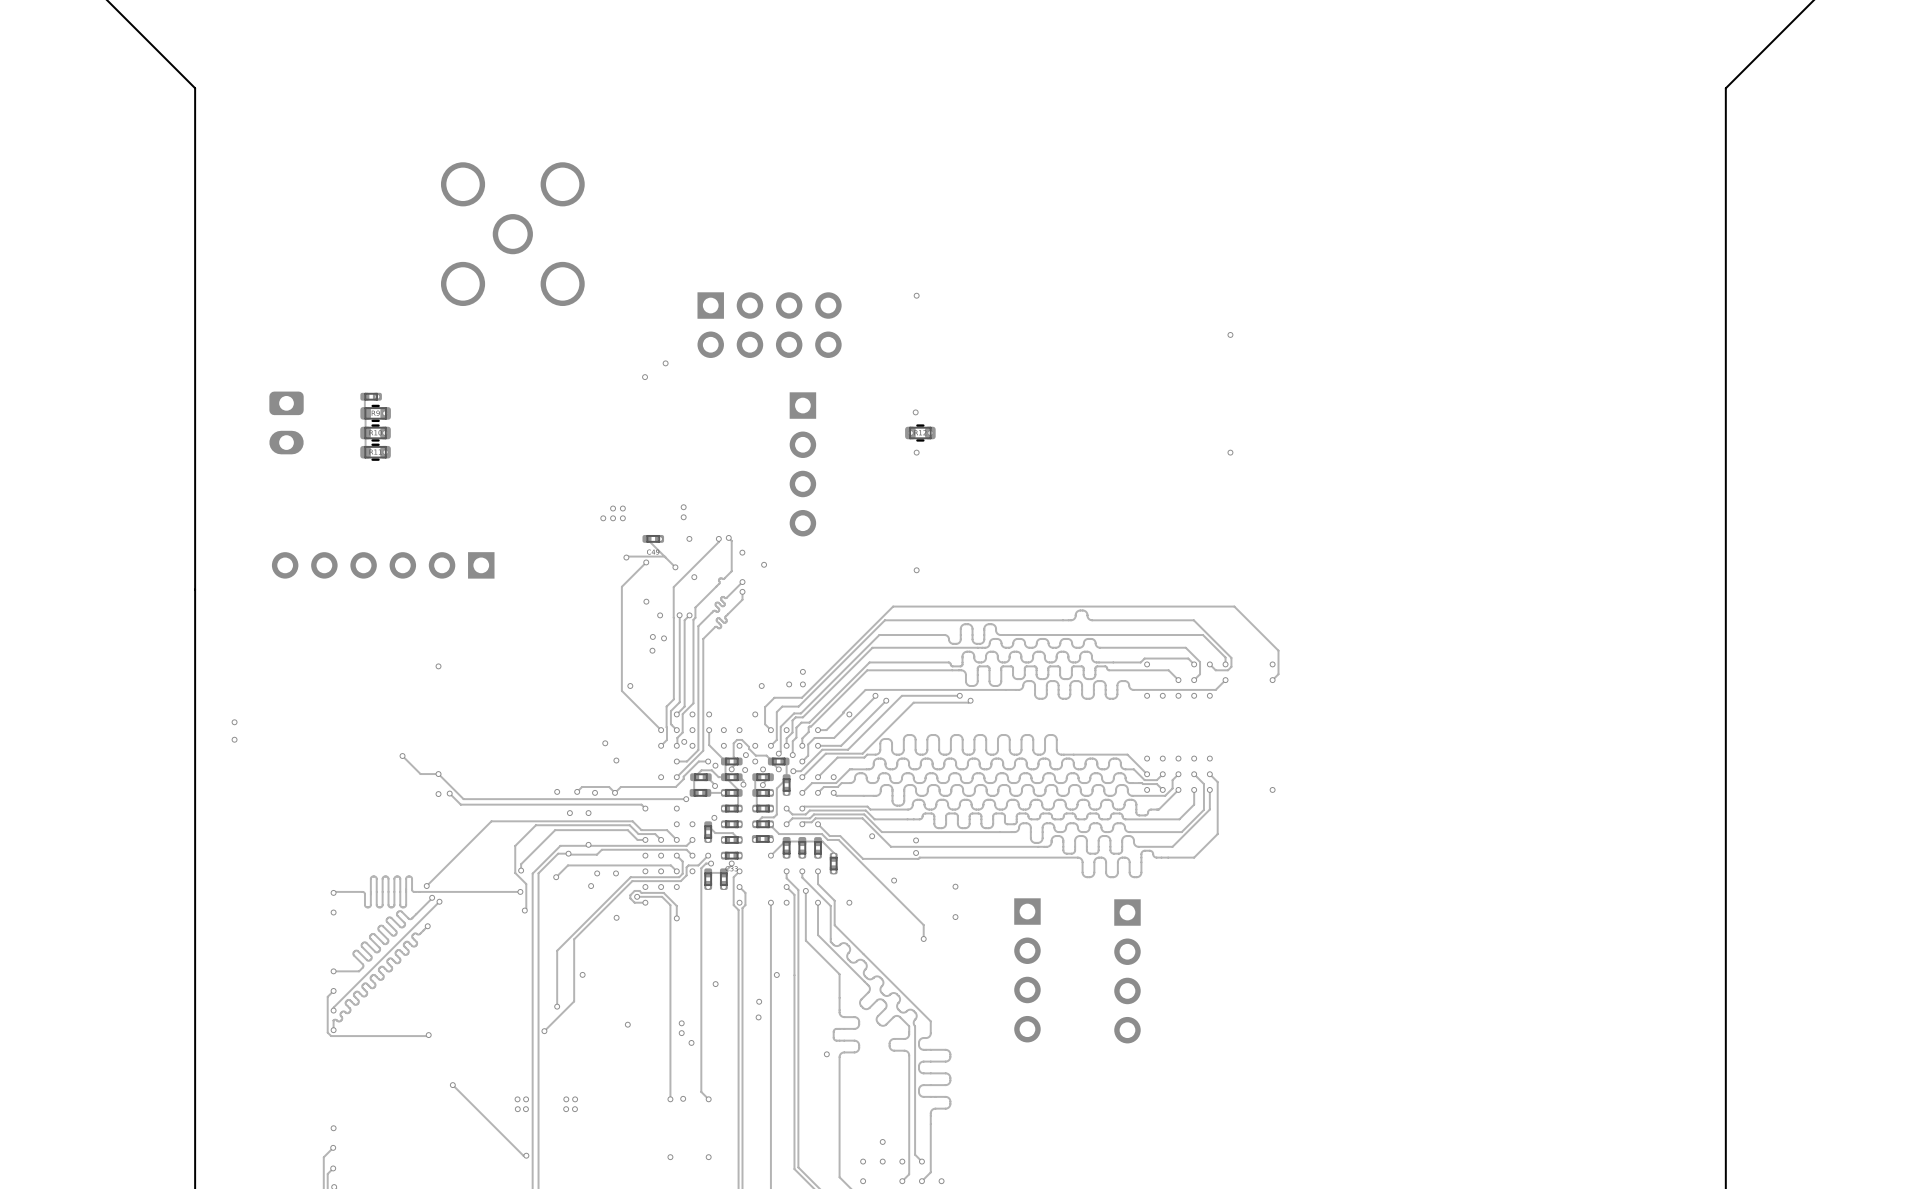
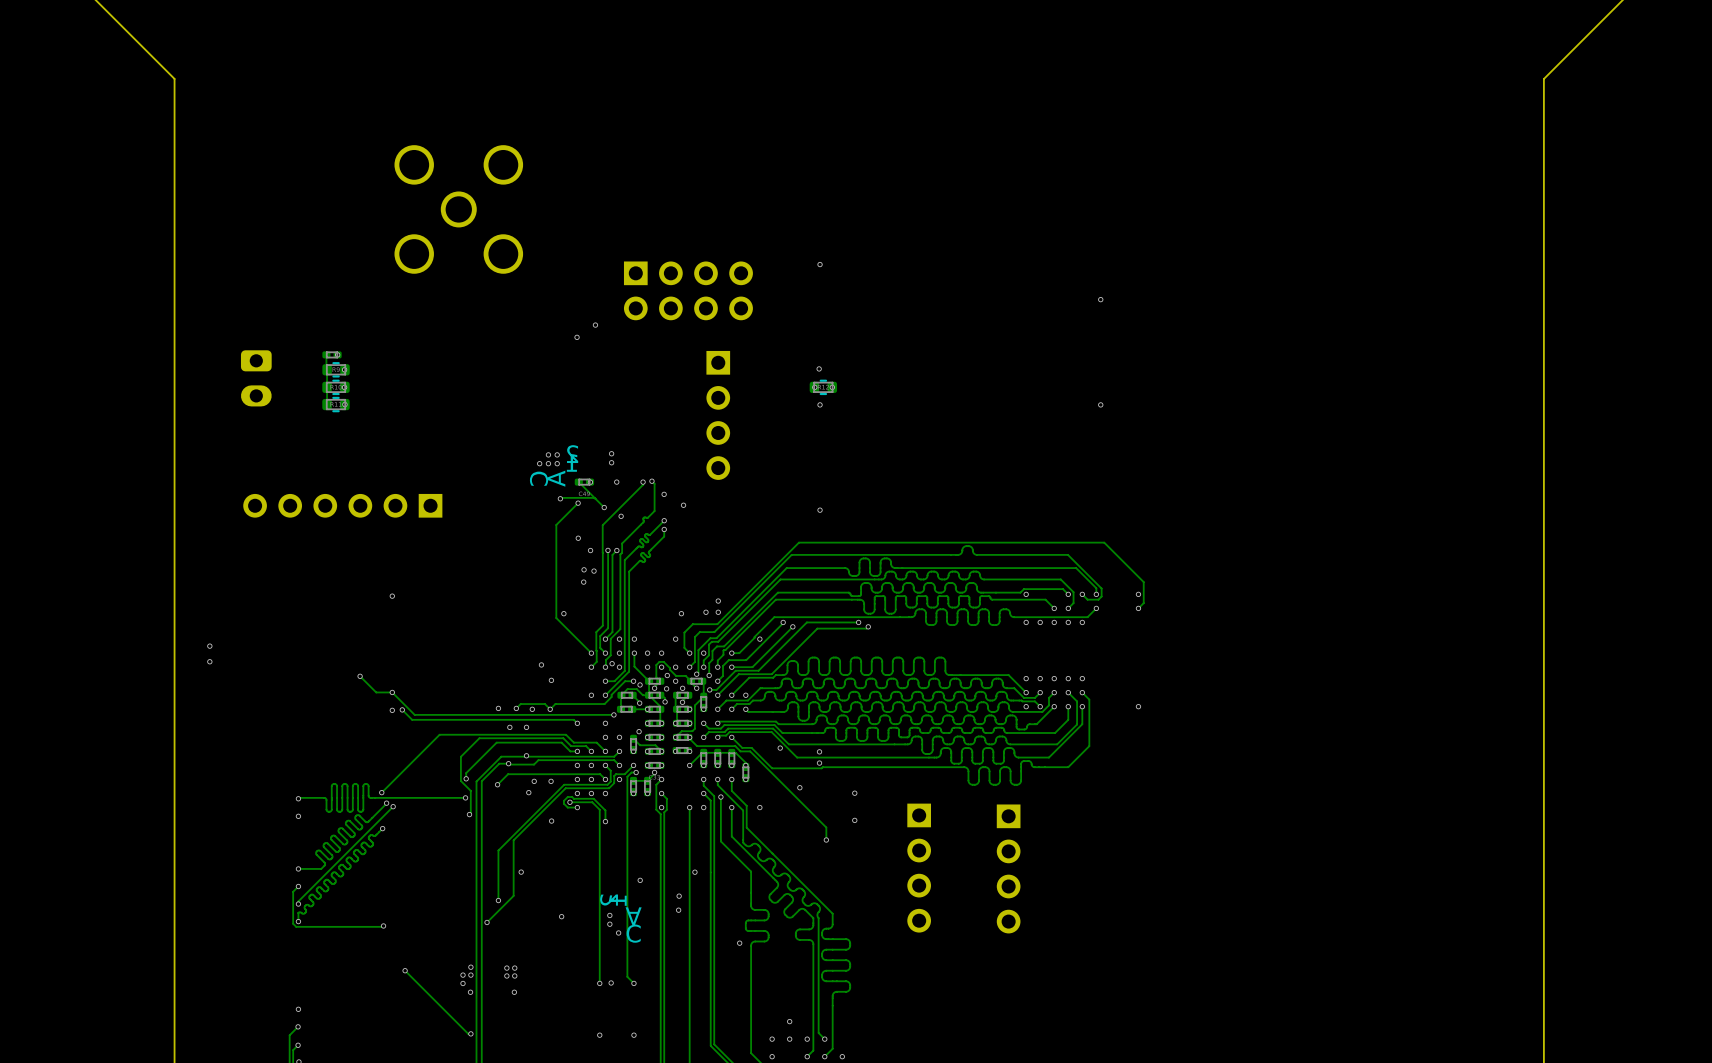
part: none -> (554, 465)
part: none -> (620, 918)
via: none -> (470, 967)
via: none -> (506, 968)
via: none -> (514, 968)
via: none -> (463, 975)
via: none -> (470, 975)
via: none -> (506, 975)
via: none -> (514, 975)
via: (526, 1099) -> none
via: (566, 1099) -> none
via: (575, 1099) -> none
via: (517, 1109) -> none
via: (566, 1109) -> none

